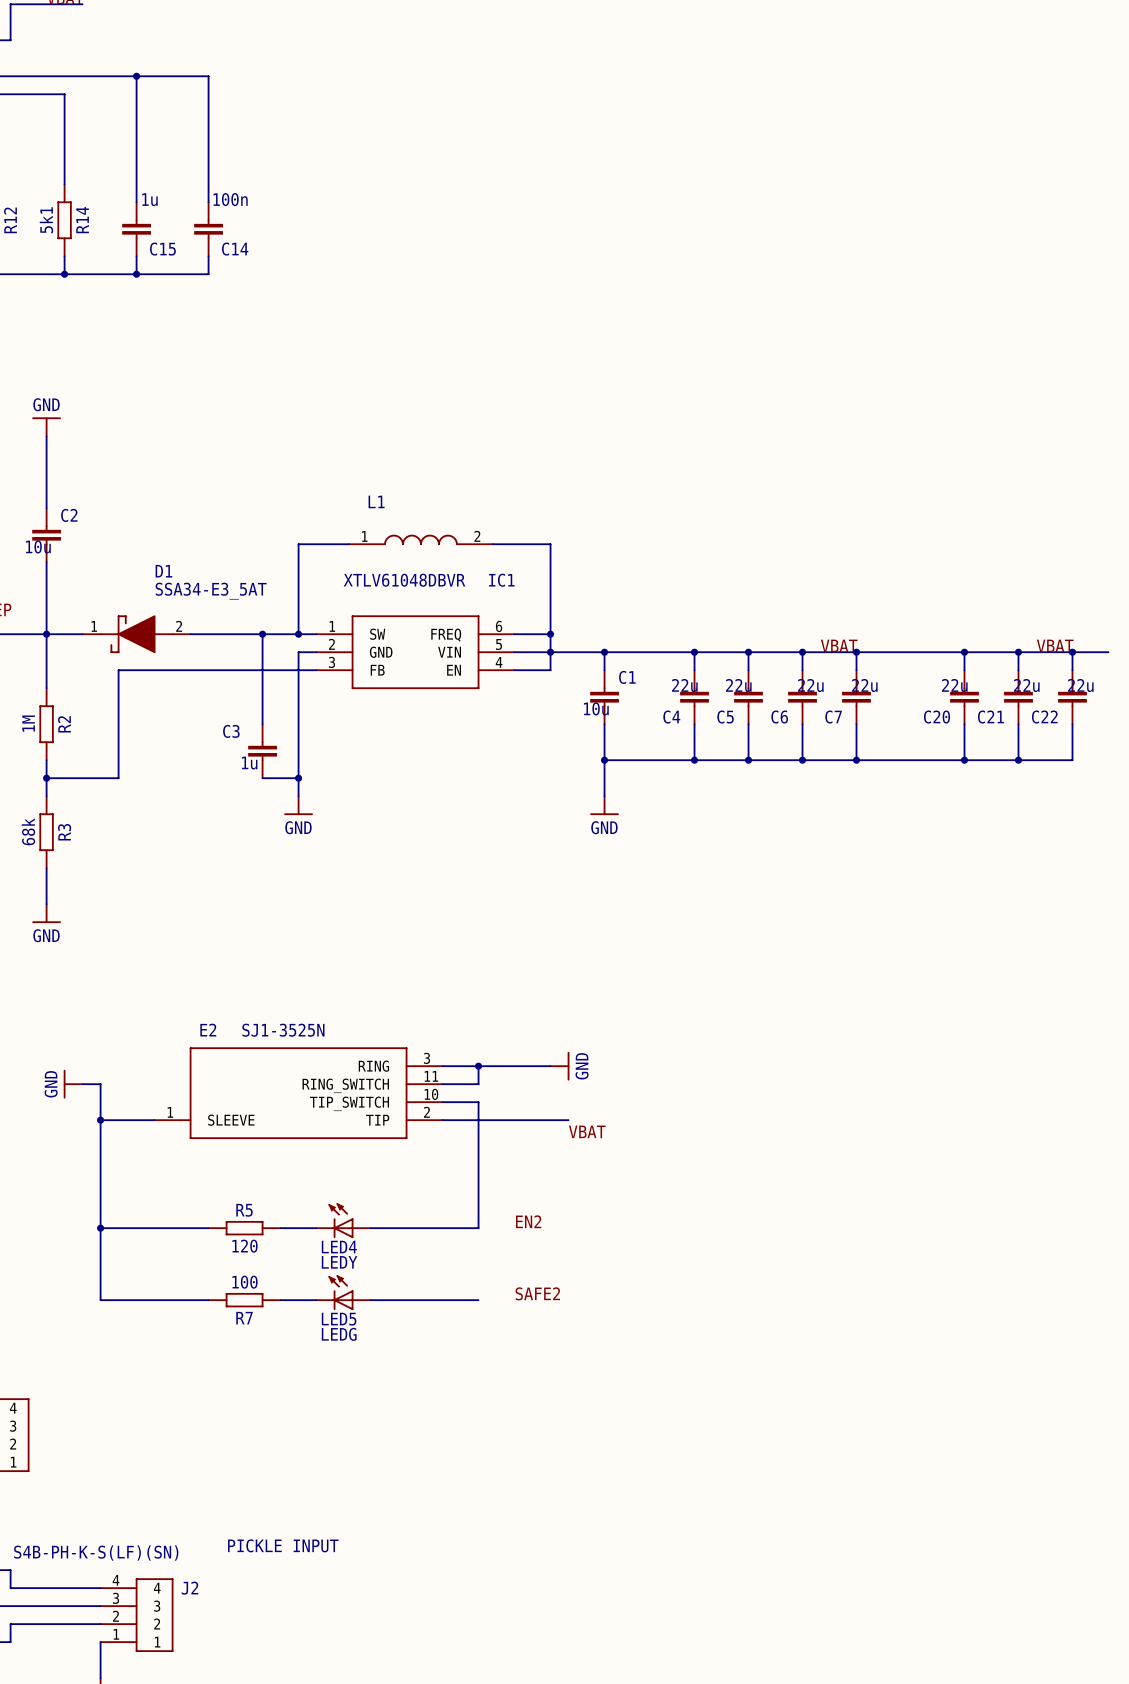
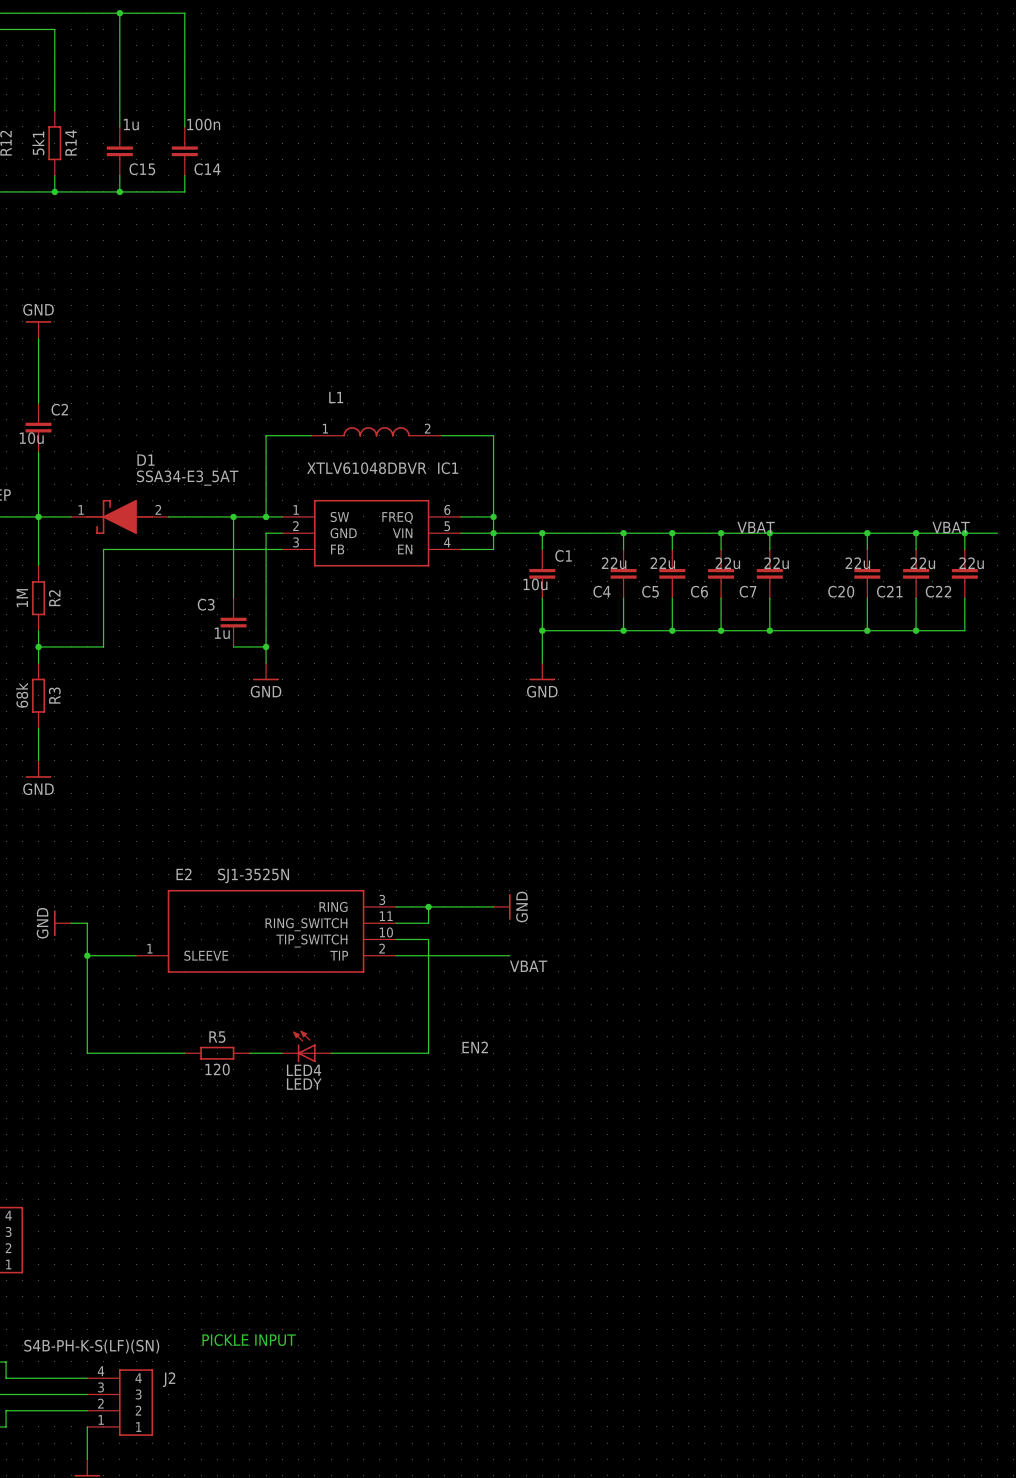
wire: (100, 1228) (100, 1300) (208, 1300) -> none
junction: (100, 1228) -> none
LED5: LEDG (343, 1292) -> none
label: SAFE2 (537, 1293) -> none
R7: 100 (244, 1300) -> none
wire: (280, 1300) (316, 1300) -> none
wire: (370, 1300) (478, 1300) -> none

